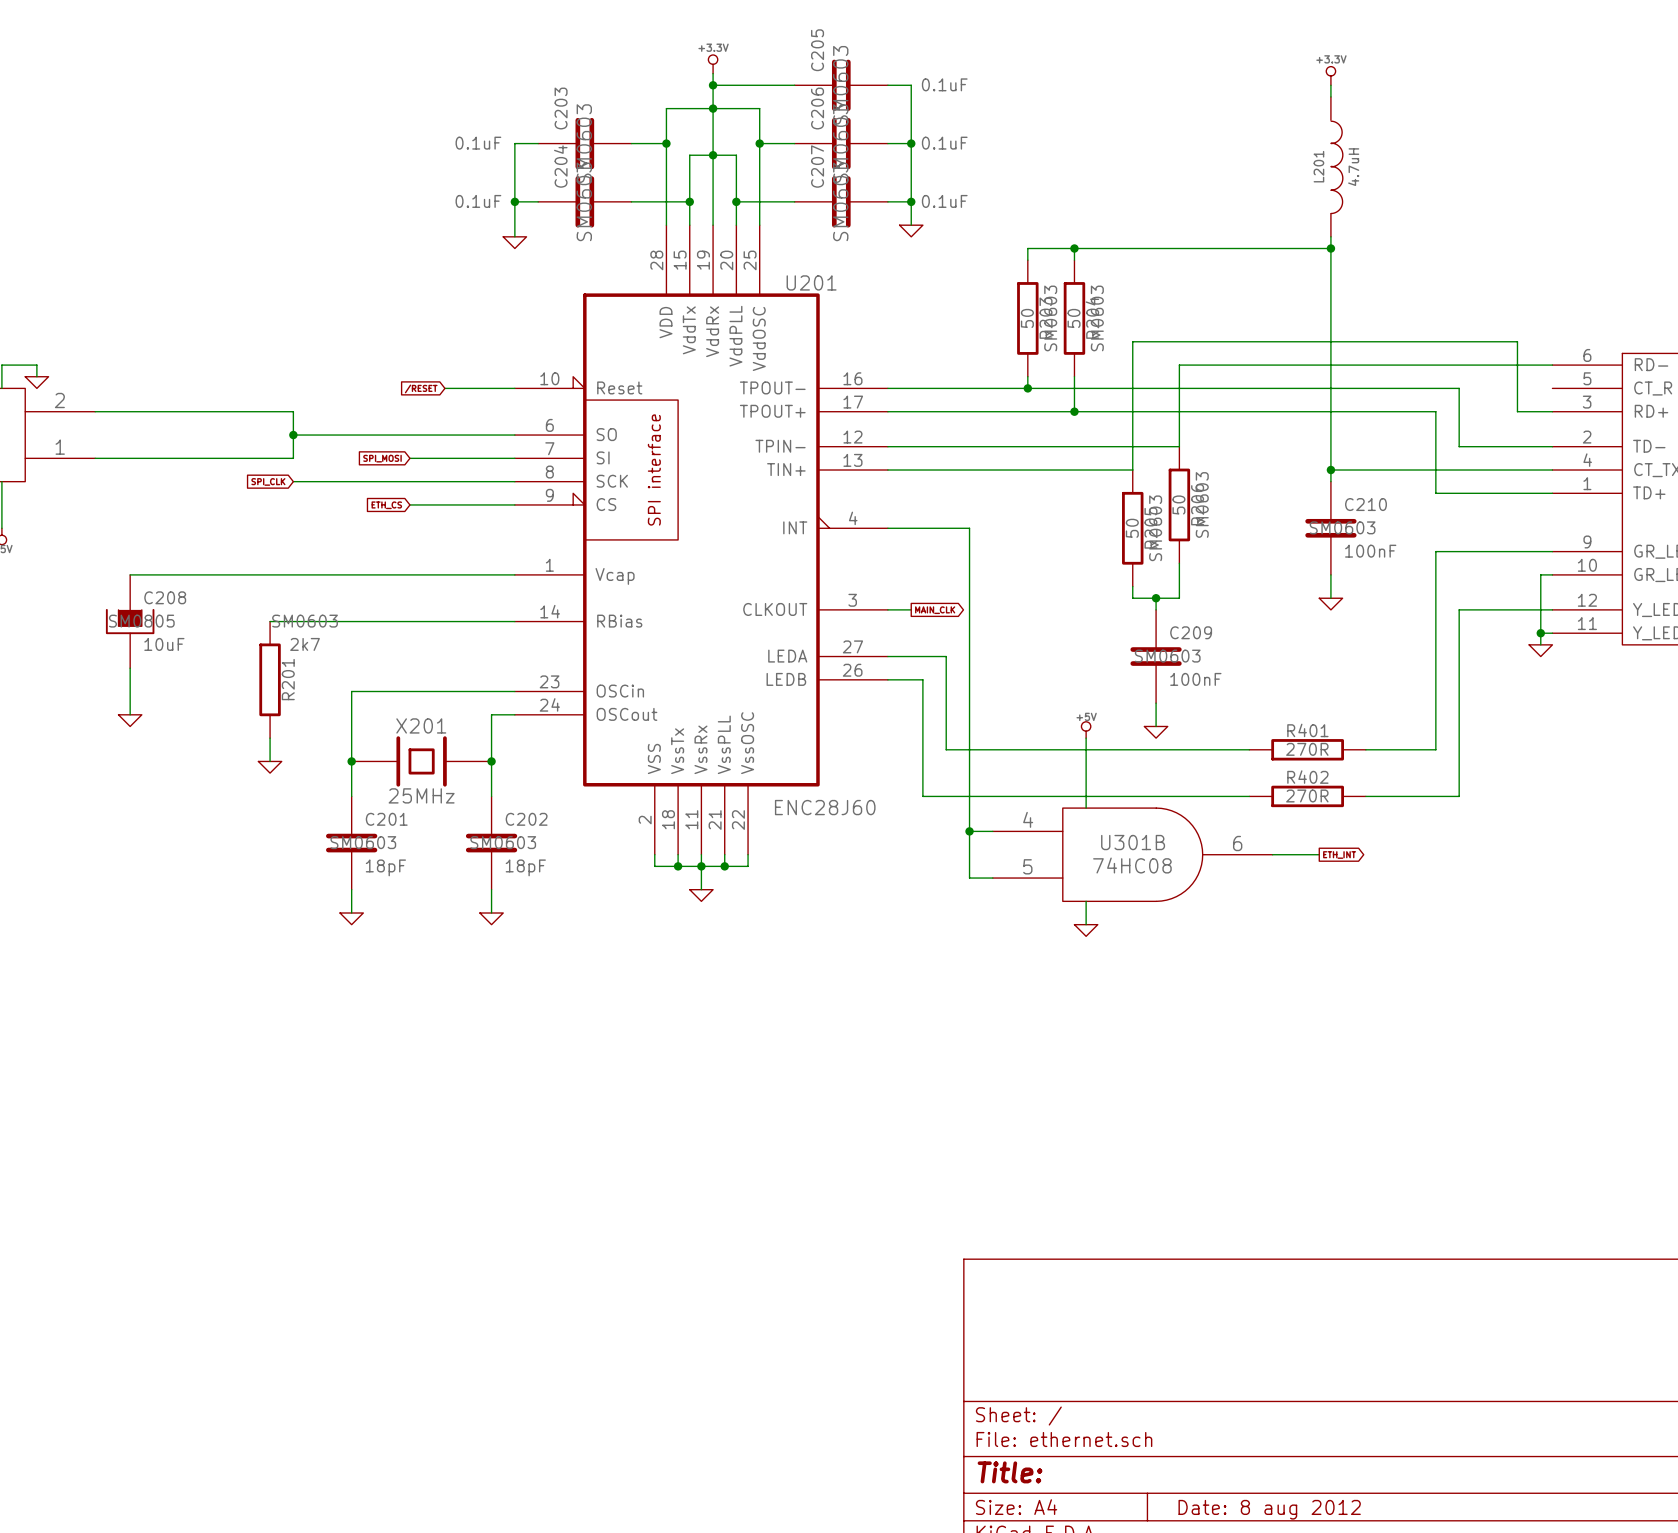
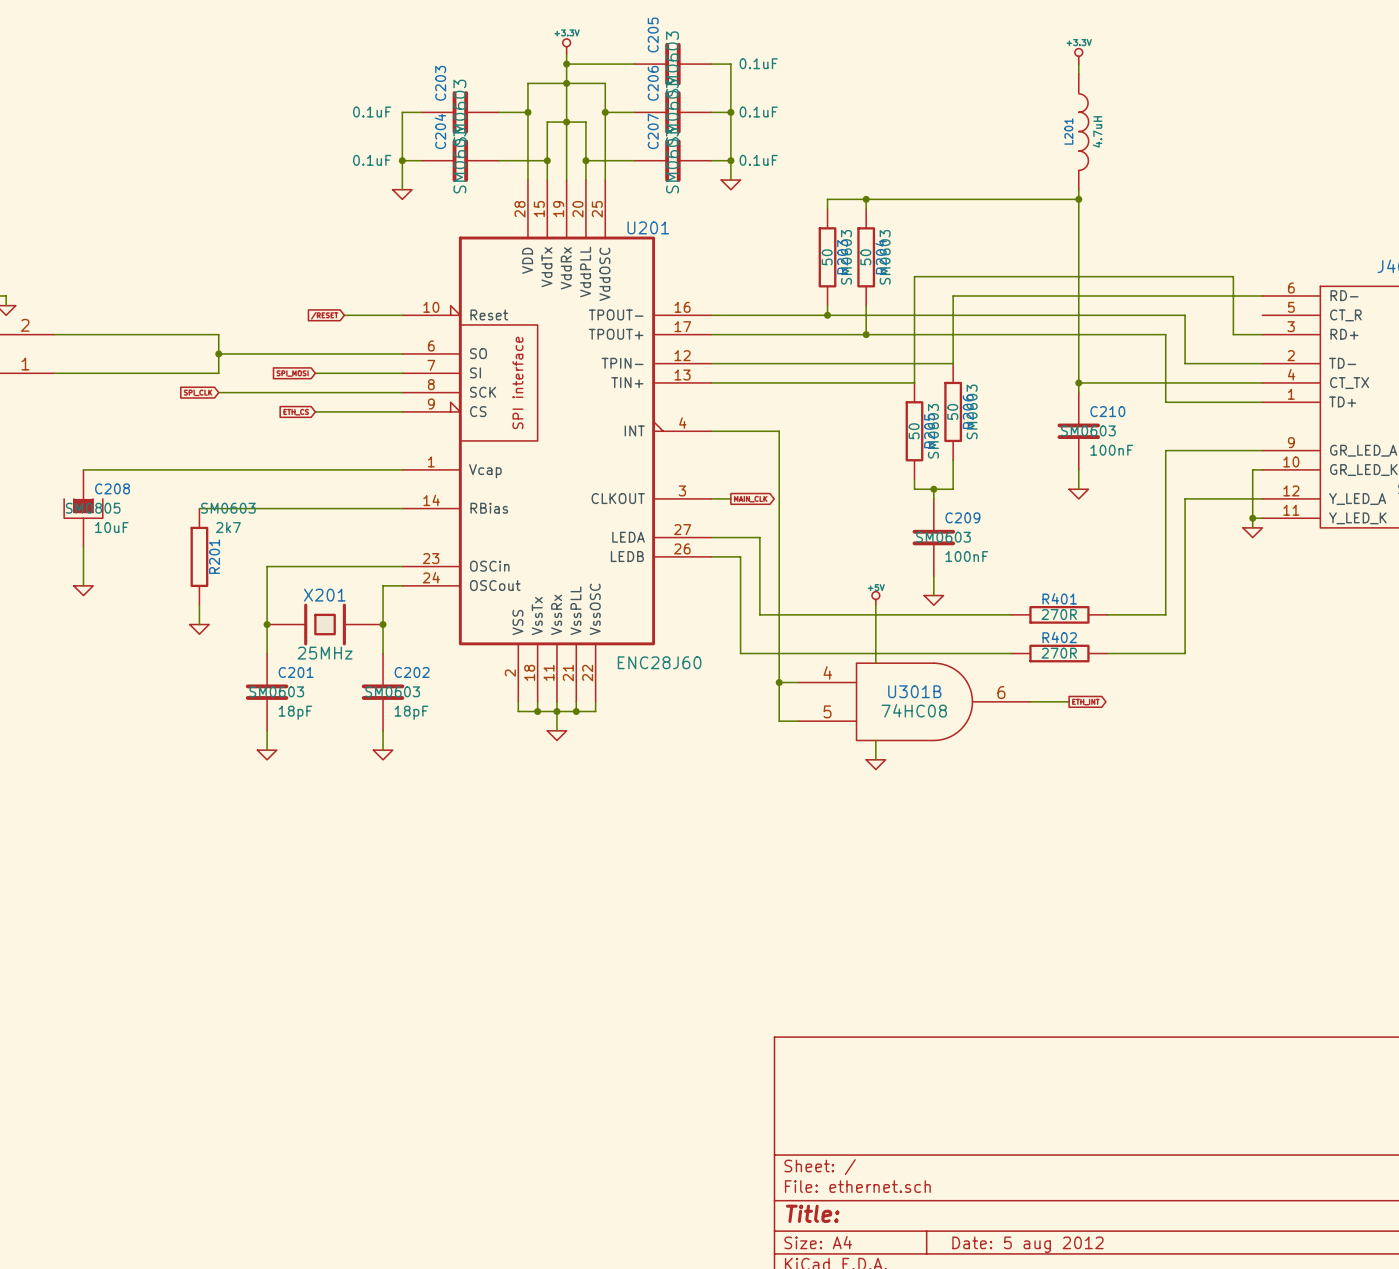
title block: Date: 8 aug 2012 (1269, 1509) -> Date: 5 aug 2012 (1027, 1244)

